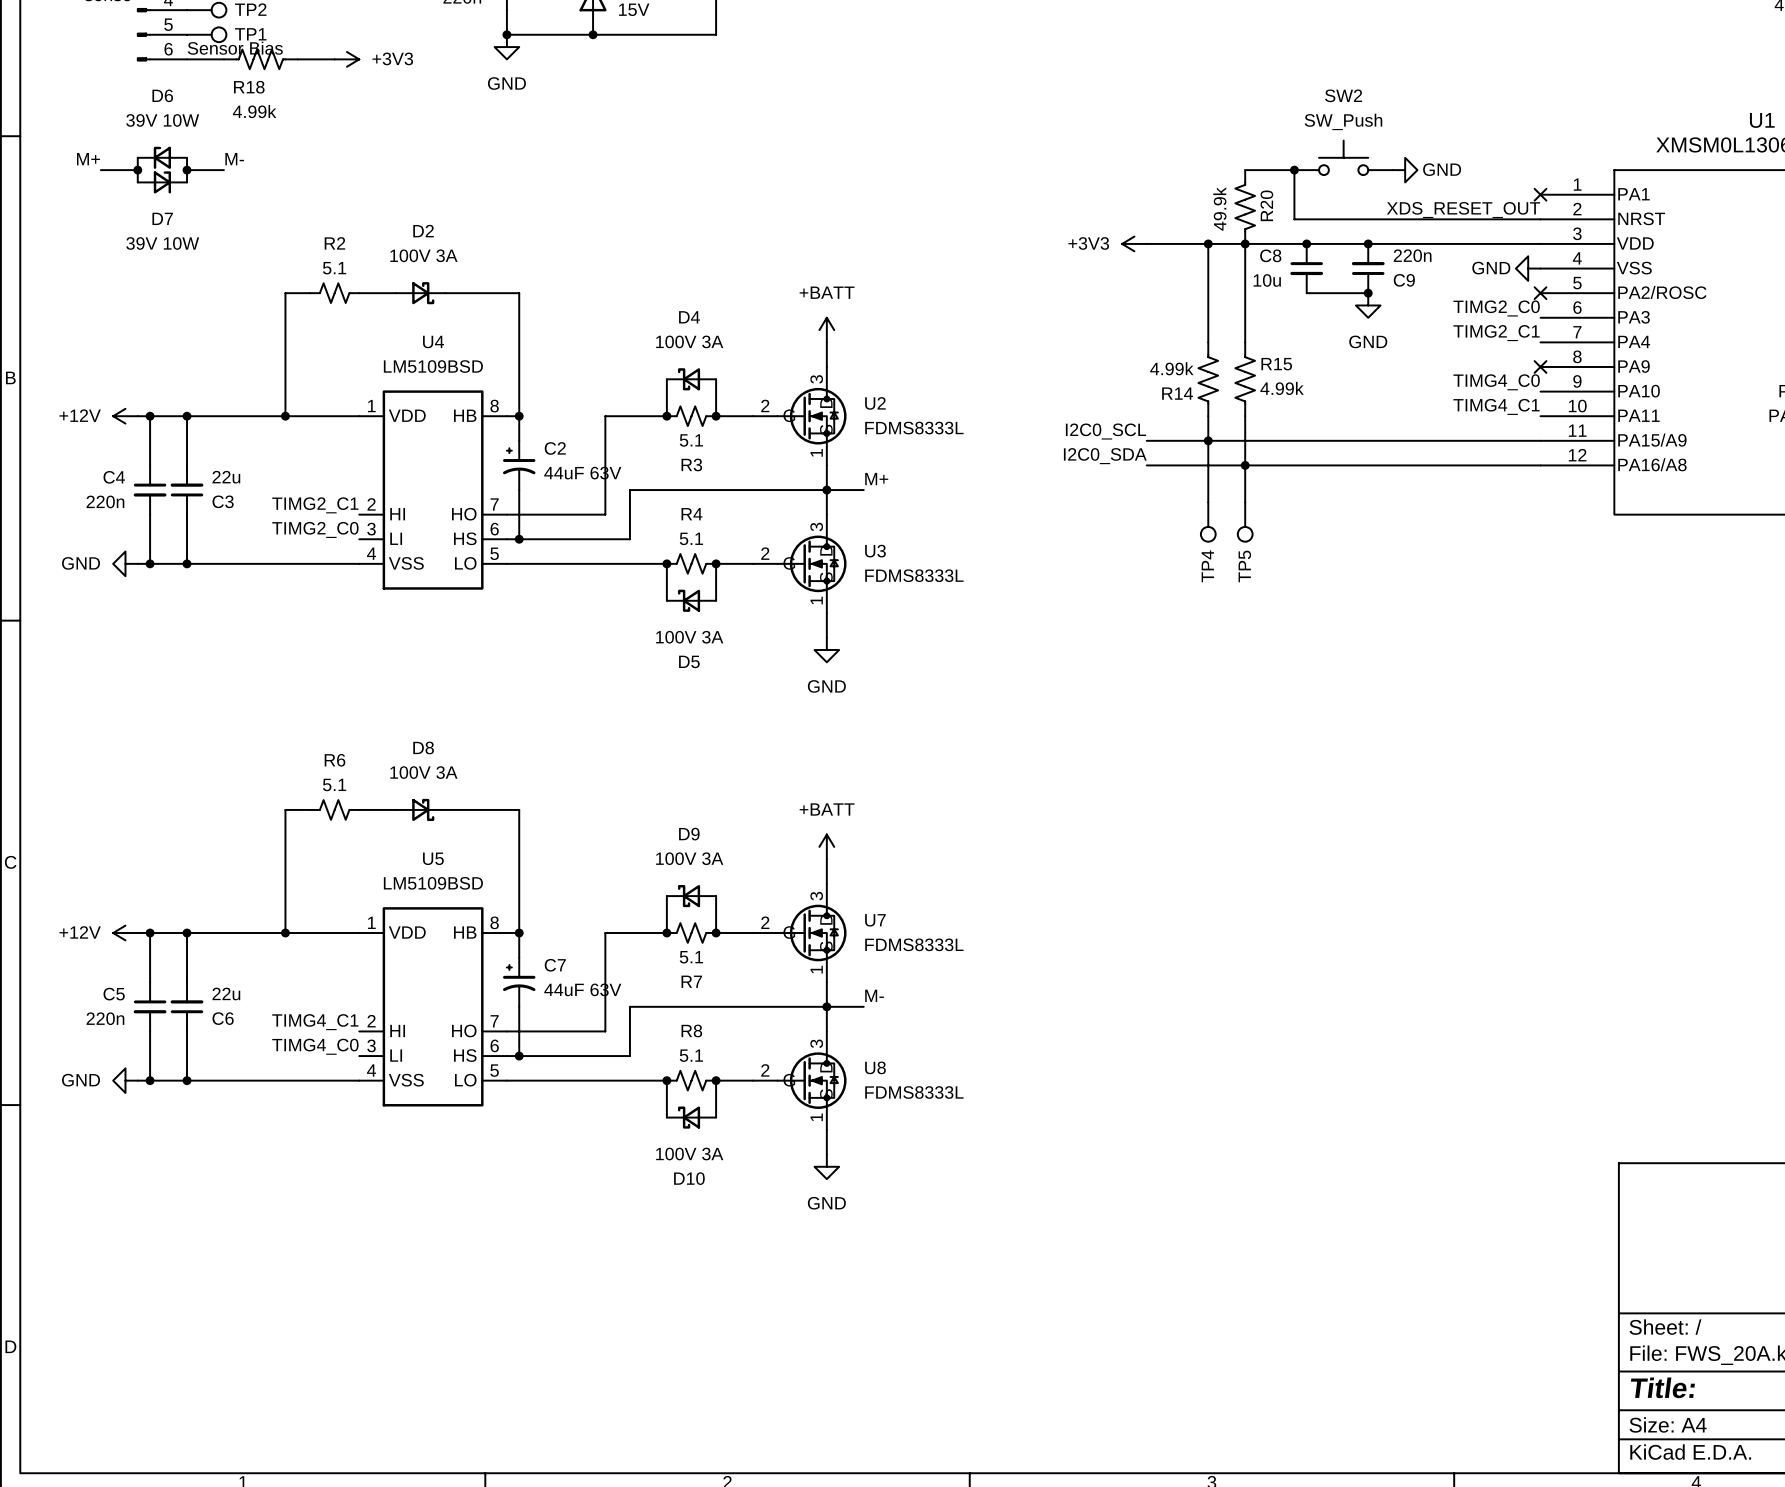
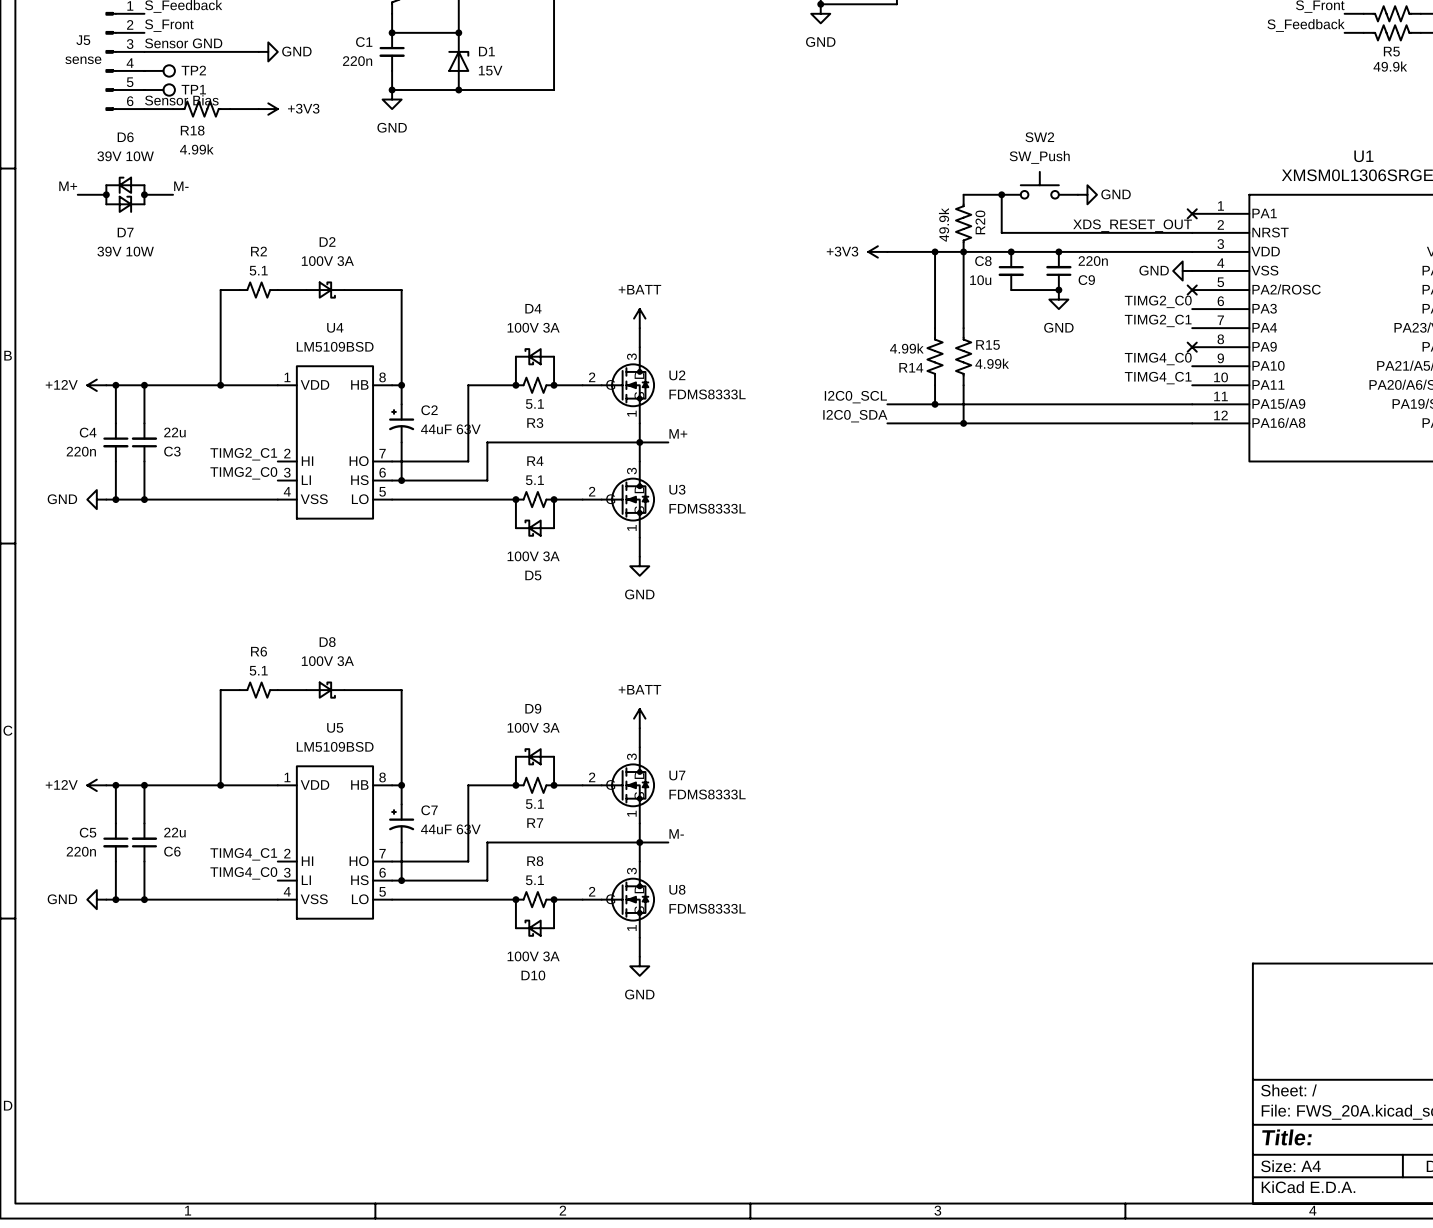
wire: (1208, 440) (1208, 502) -> none
wire: (1245, 465) (1245, 502) -> none
TP4: (1208, 522) -> none
TP5: (1245, 522) -> none

